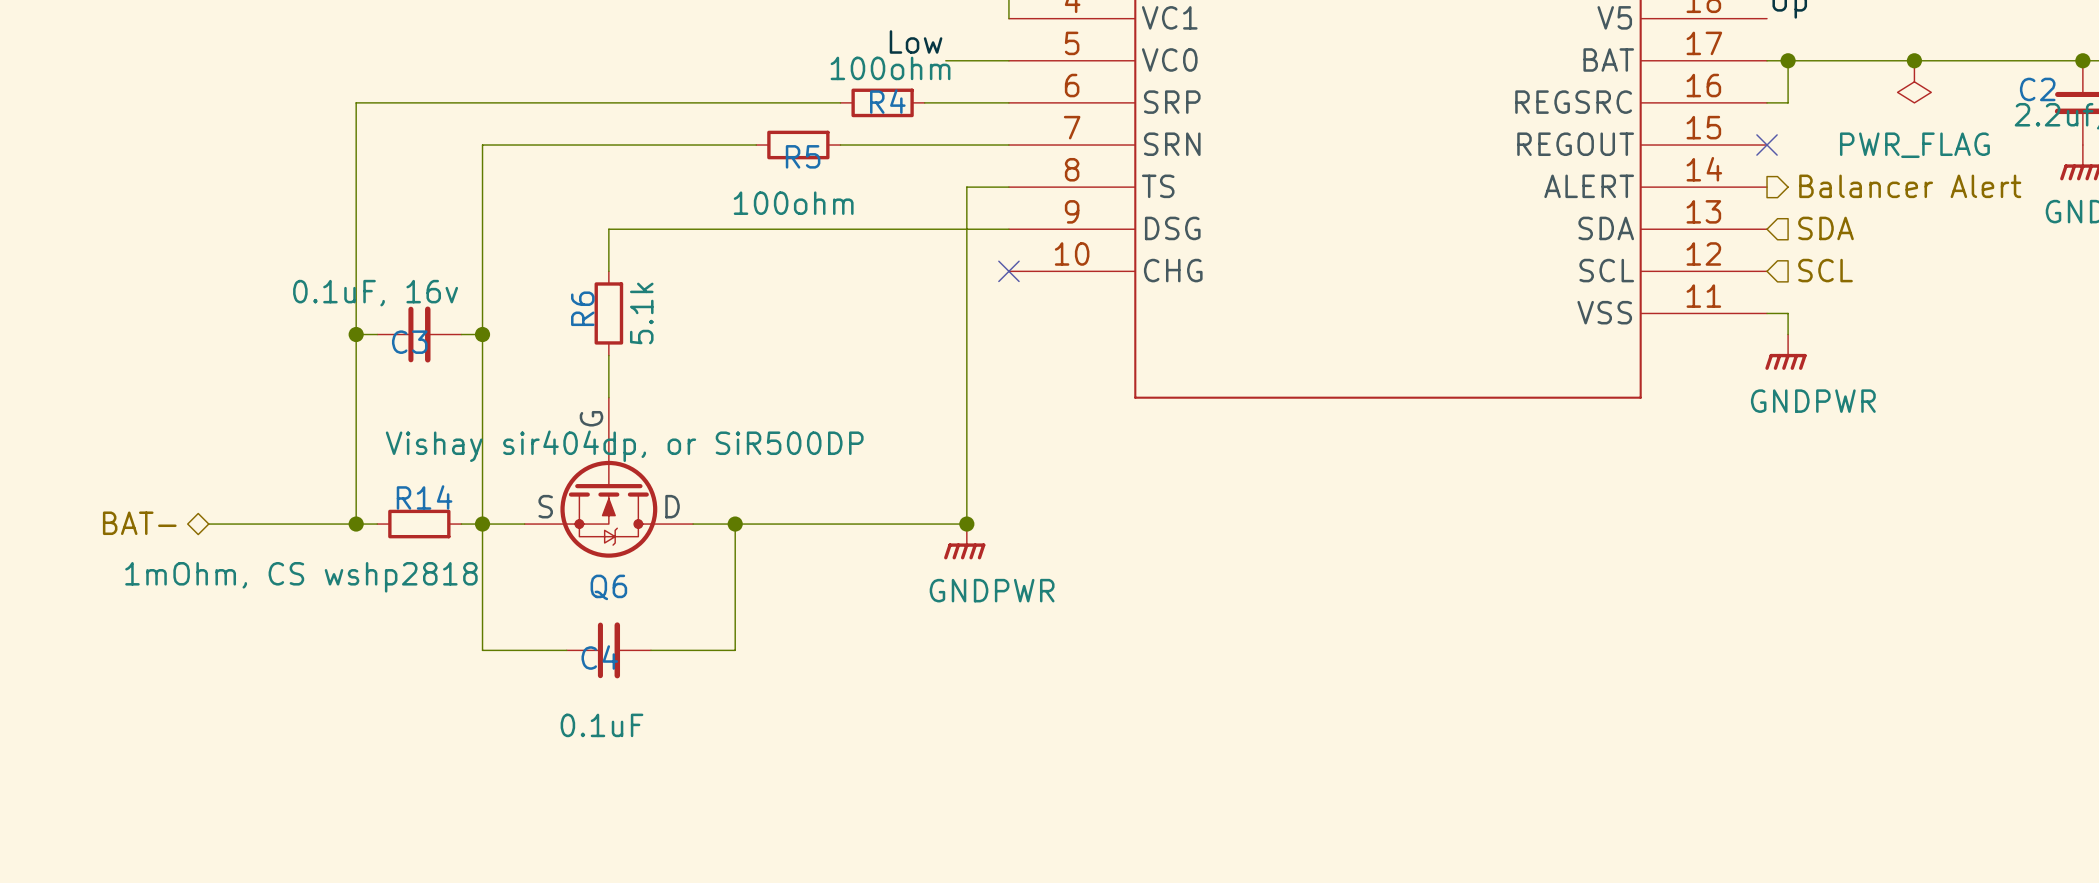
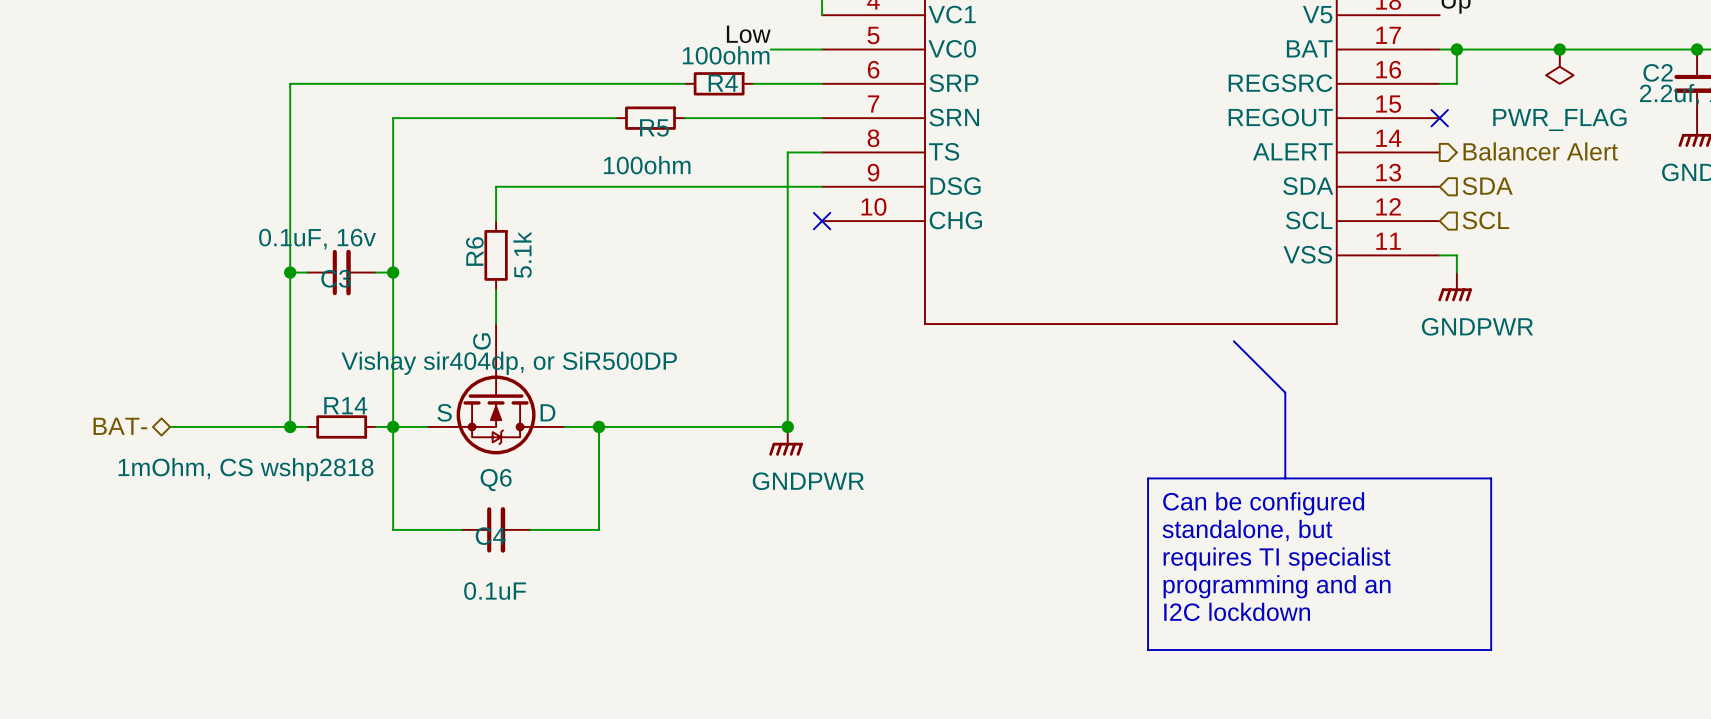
line: none -> (1233, 341) (1285, 392) (1285, 478)
line: none -> (1148, 478) (1491, 478) (1491, 650) (1148, 650) (1148, 478)
text: none -> Can be configured (1263, 503)
text: none -> standalone, but (1247, 530)
text: none -> requires TI specialist (1277, 559)
text: none -> programming and an (1277, 586)
text: none -> I2C lockdown (1237, 611)

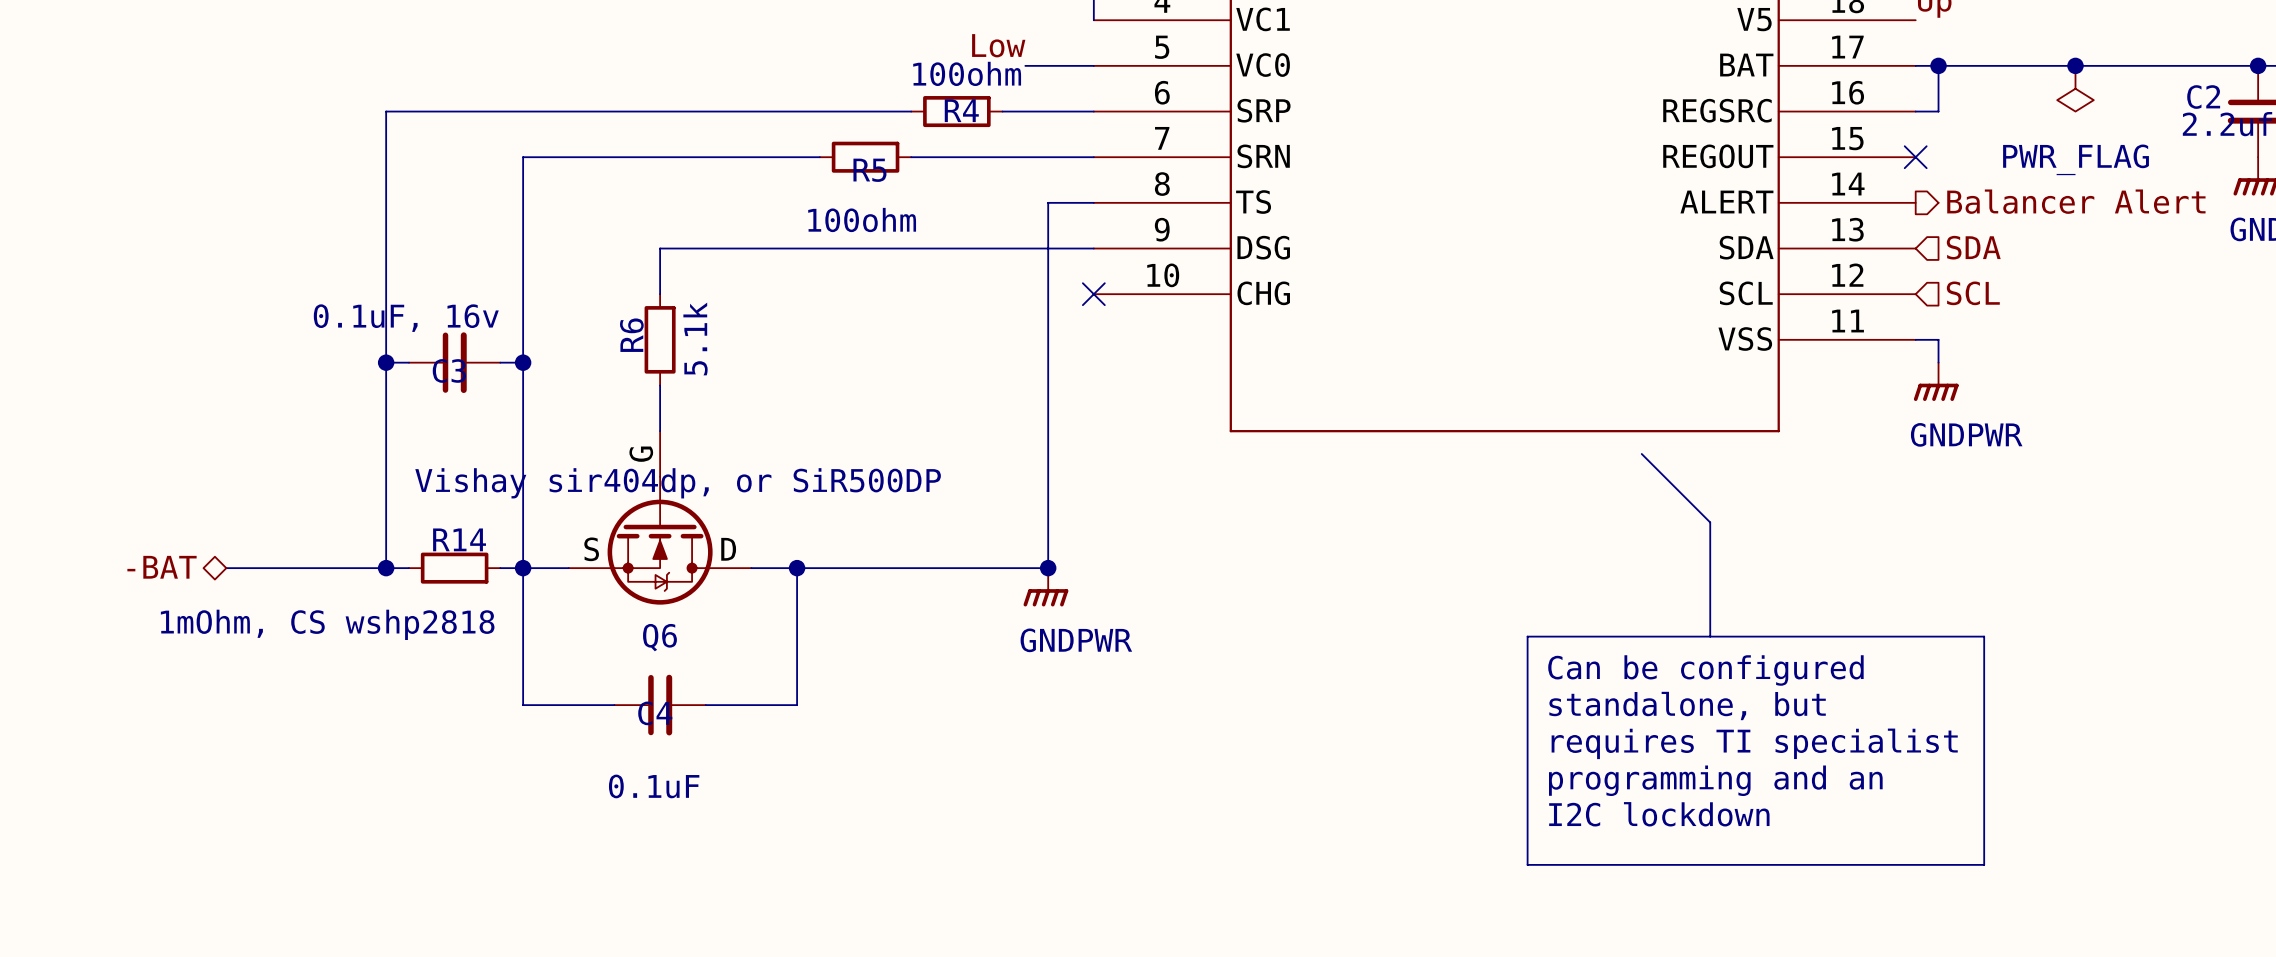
hierarchical label: BAT- (120, 426) -> -BAT (162, 567)

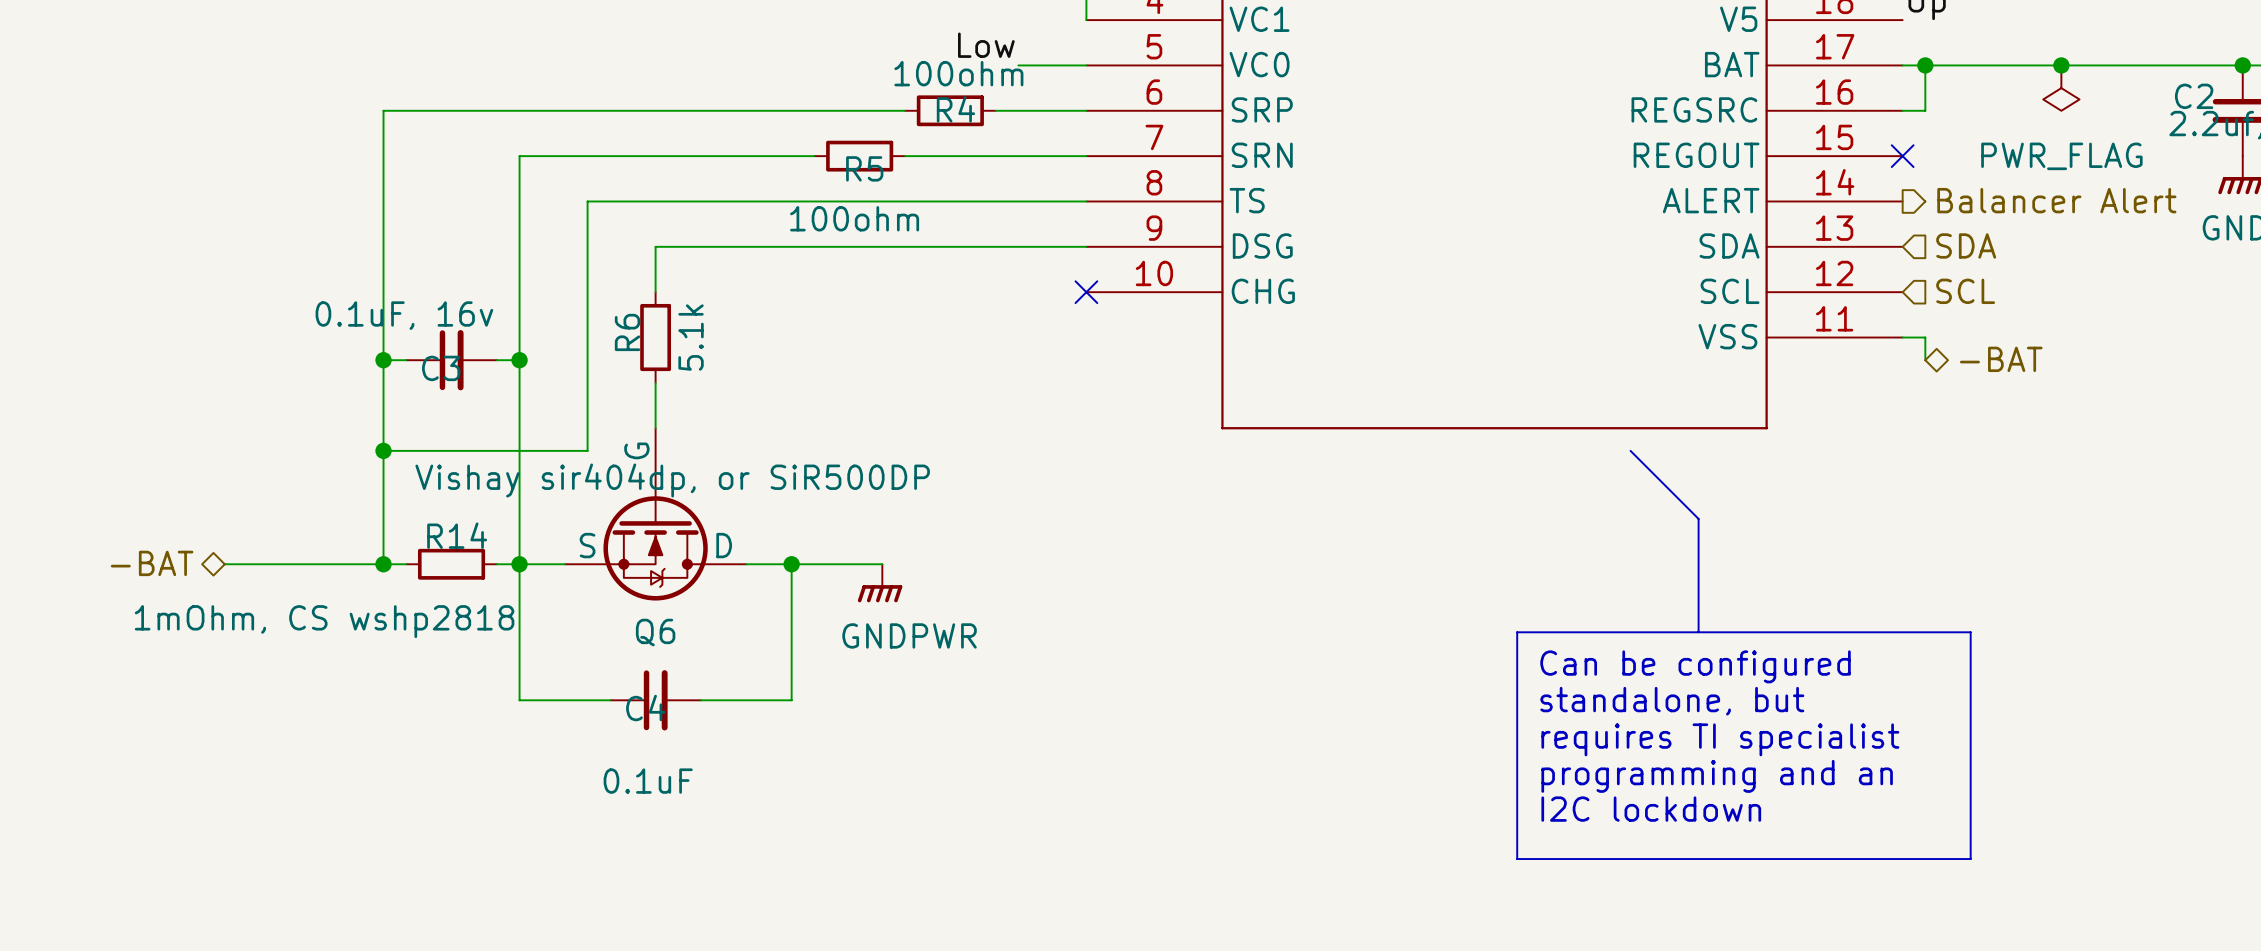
wire: (1048, 202) (1048, 568) (888, 568) -> (1041, 201) (587, 201) (587, 450) (383, 450)
hierarchical label: none -> -BAT (2001, 359)
power symbol: GNDPWR (1936, 381) -> none
junction: none -> (383, 450)
junction: (1048, 568) -> none
power symbol position: GNDPWR (1045, 587) -> GNDPWR (880, 583)

